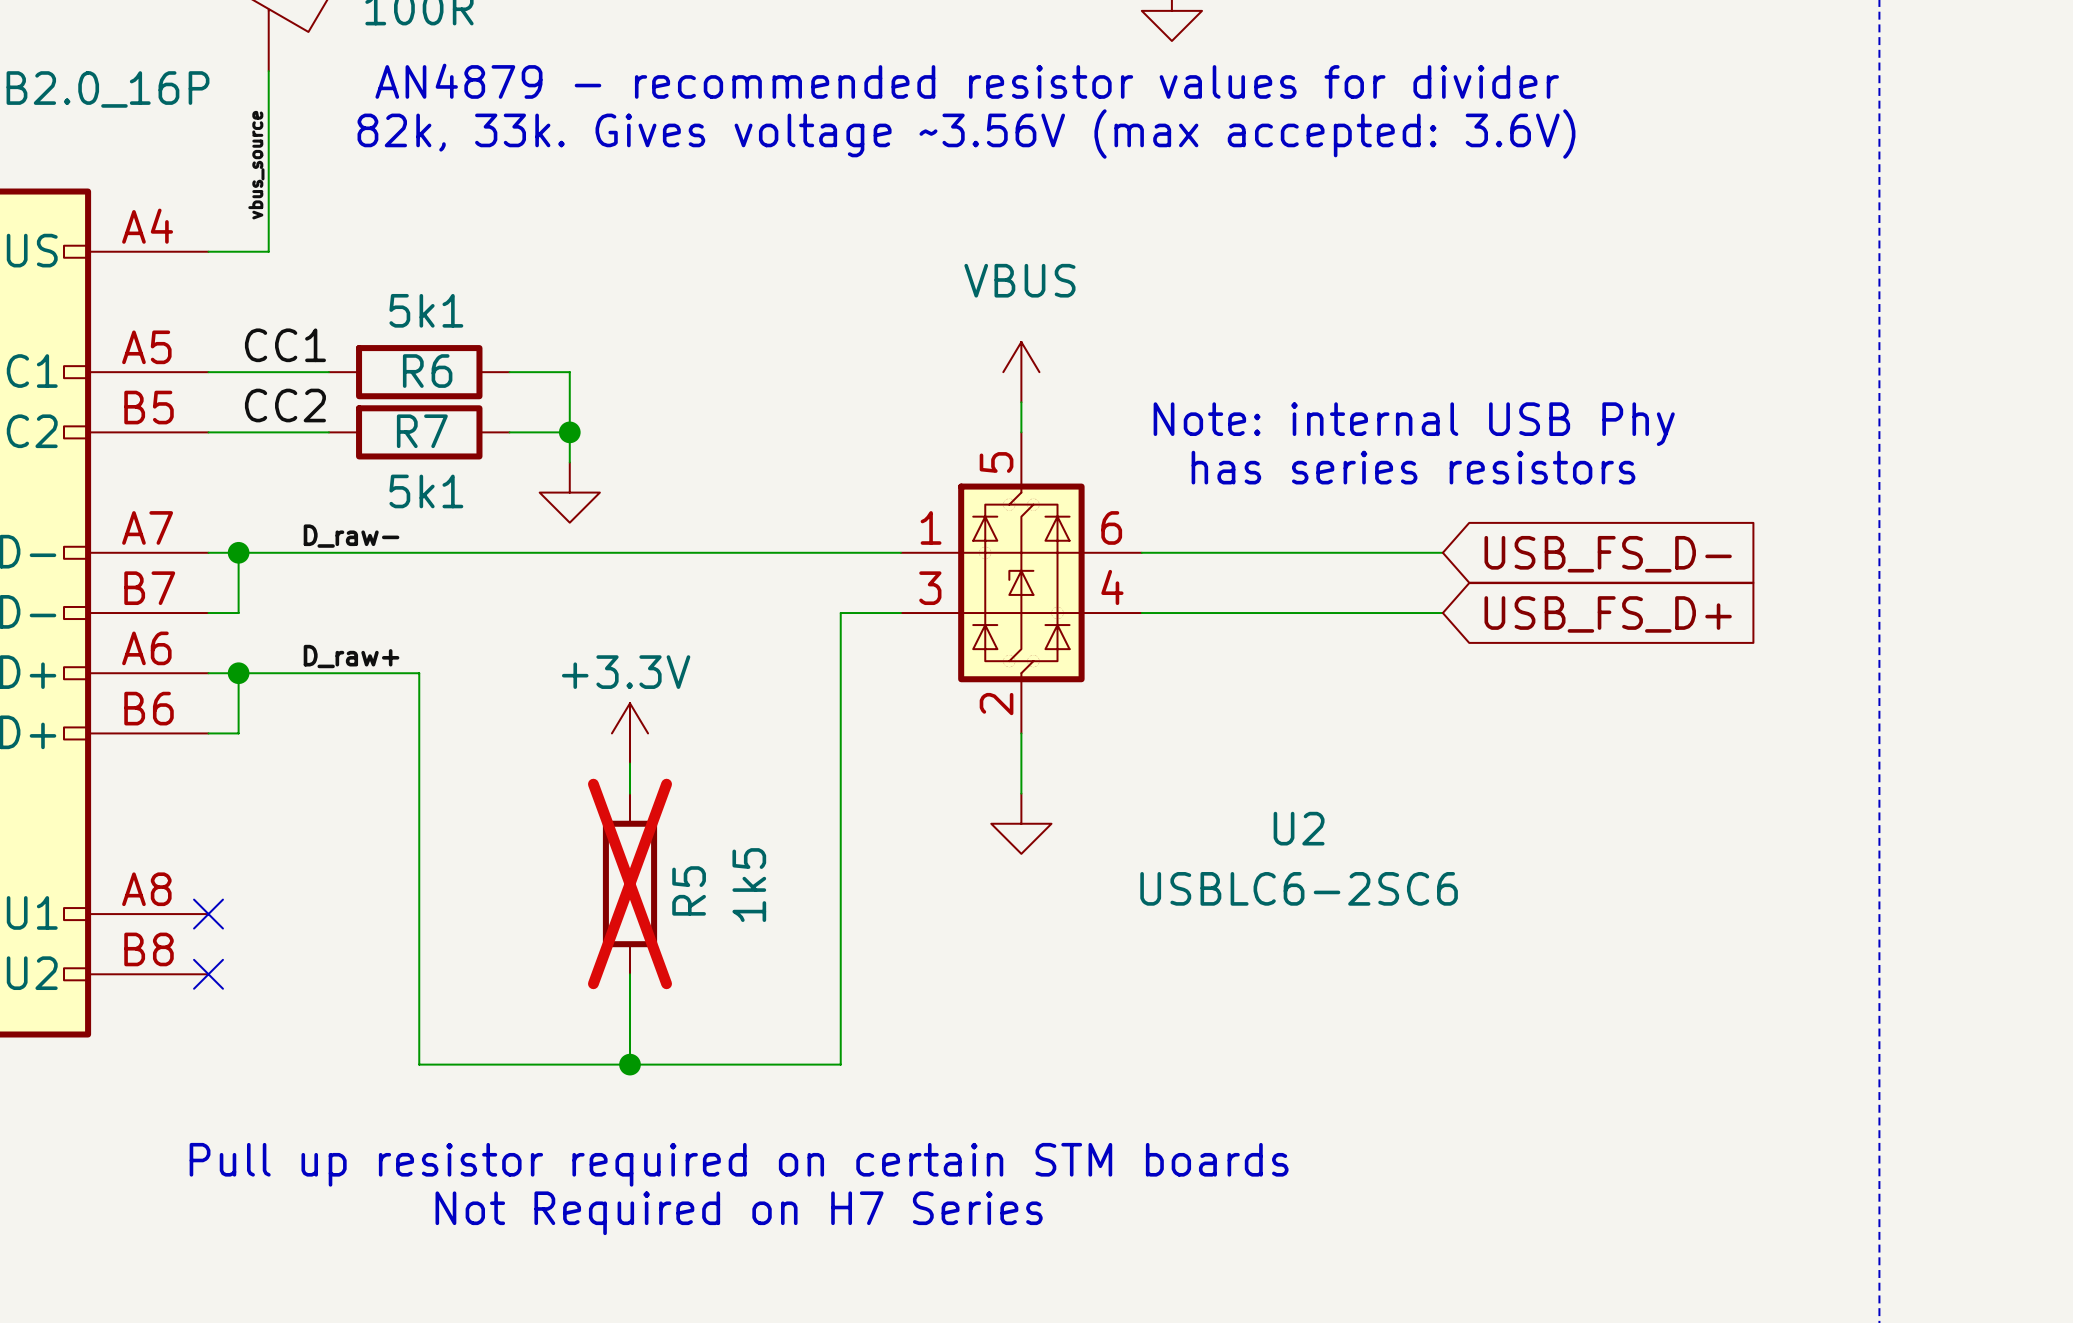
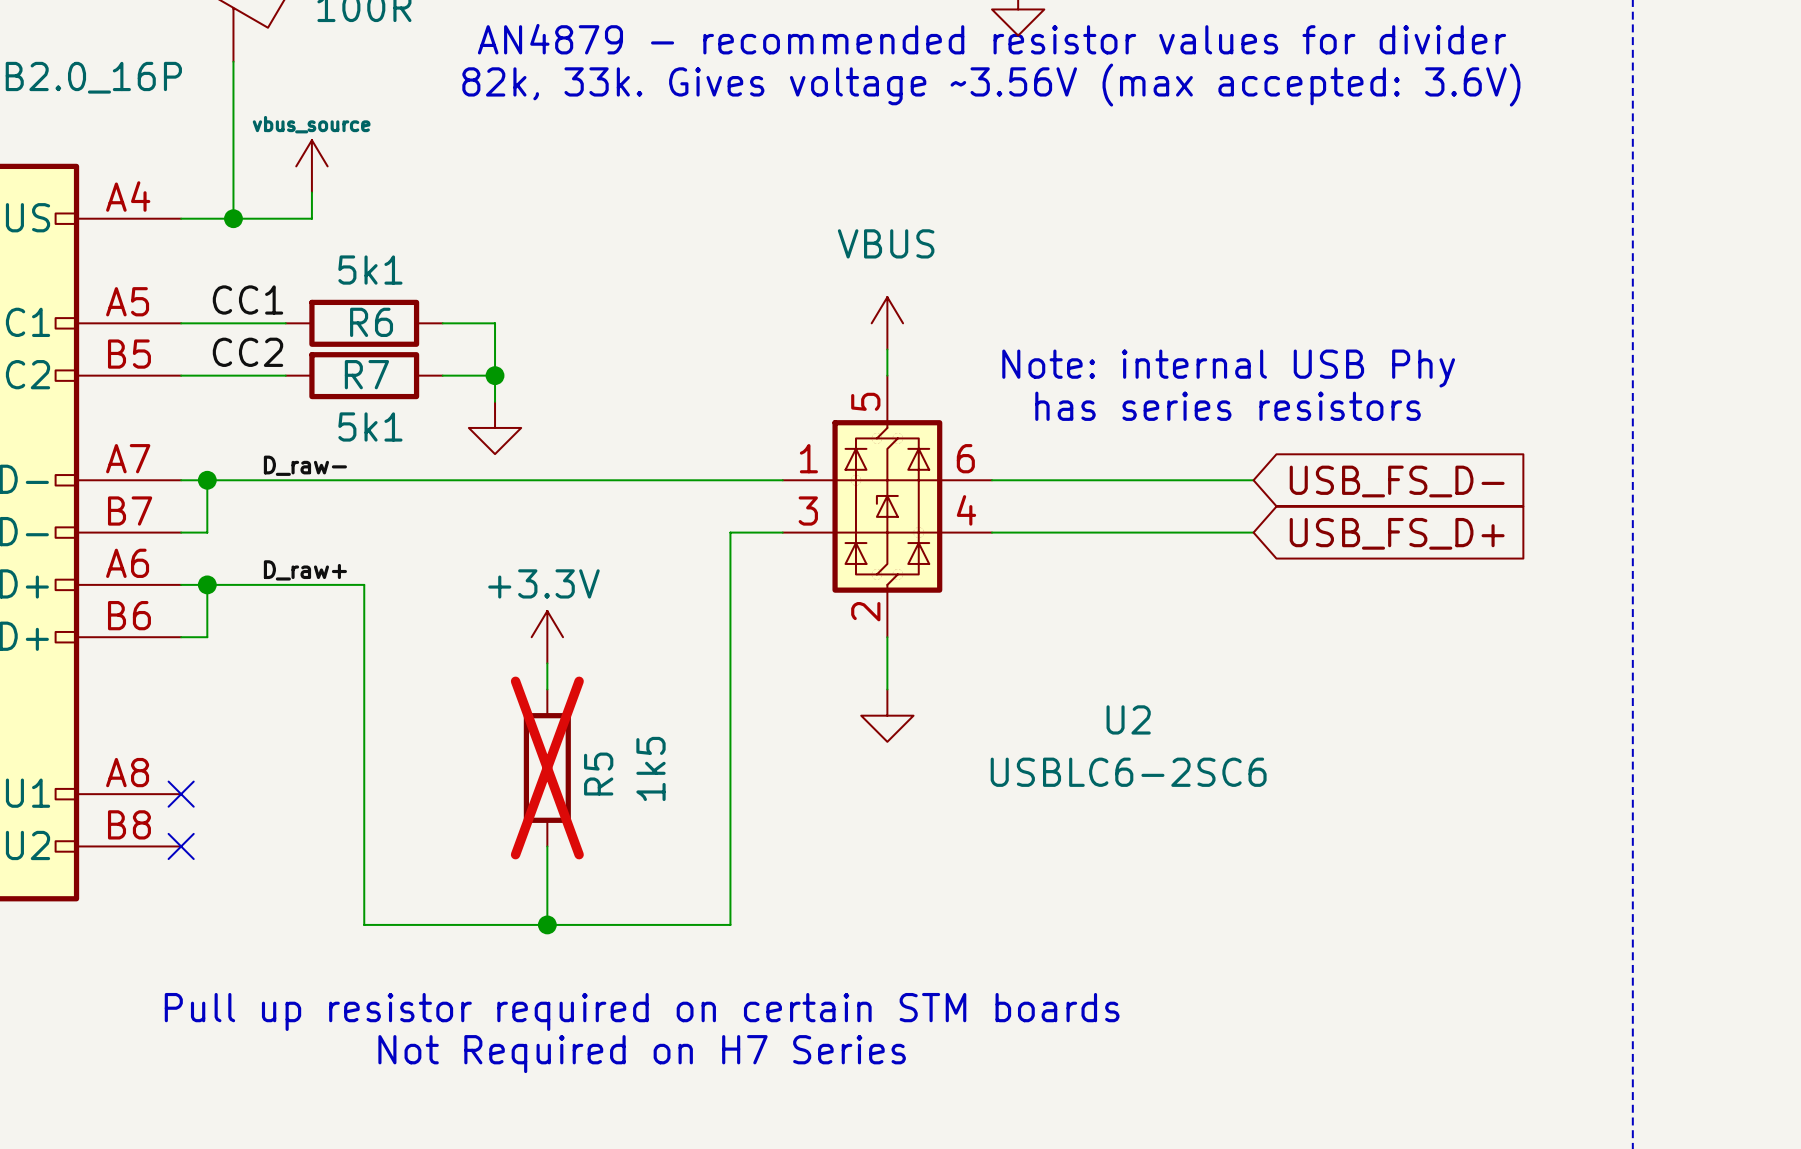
text position: AN4879 - recommended resistor values for divider (967, 81) -> AN4879 - recommended resistor values for divider (992, 39)
text position: 82k, 33k. Gives voltage ~3.56V (max accepted: 3.6V) (966, 134) -> 82k, 33k. Gives voltage ~3.56V (max accepted: 3.6V) (991, 85)
label: vbus_source (256, 165) -> none
power symbol: none -> vbus_source (311, 166)
wire: none -> (311, 192) (311, 218) (233, 218)
junction: none -> (233, 218)

